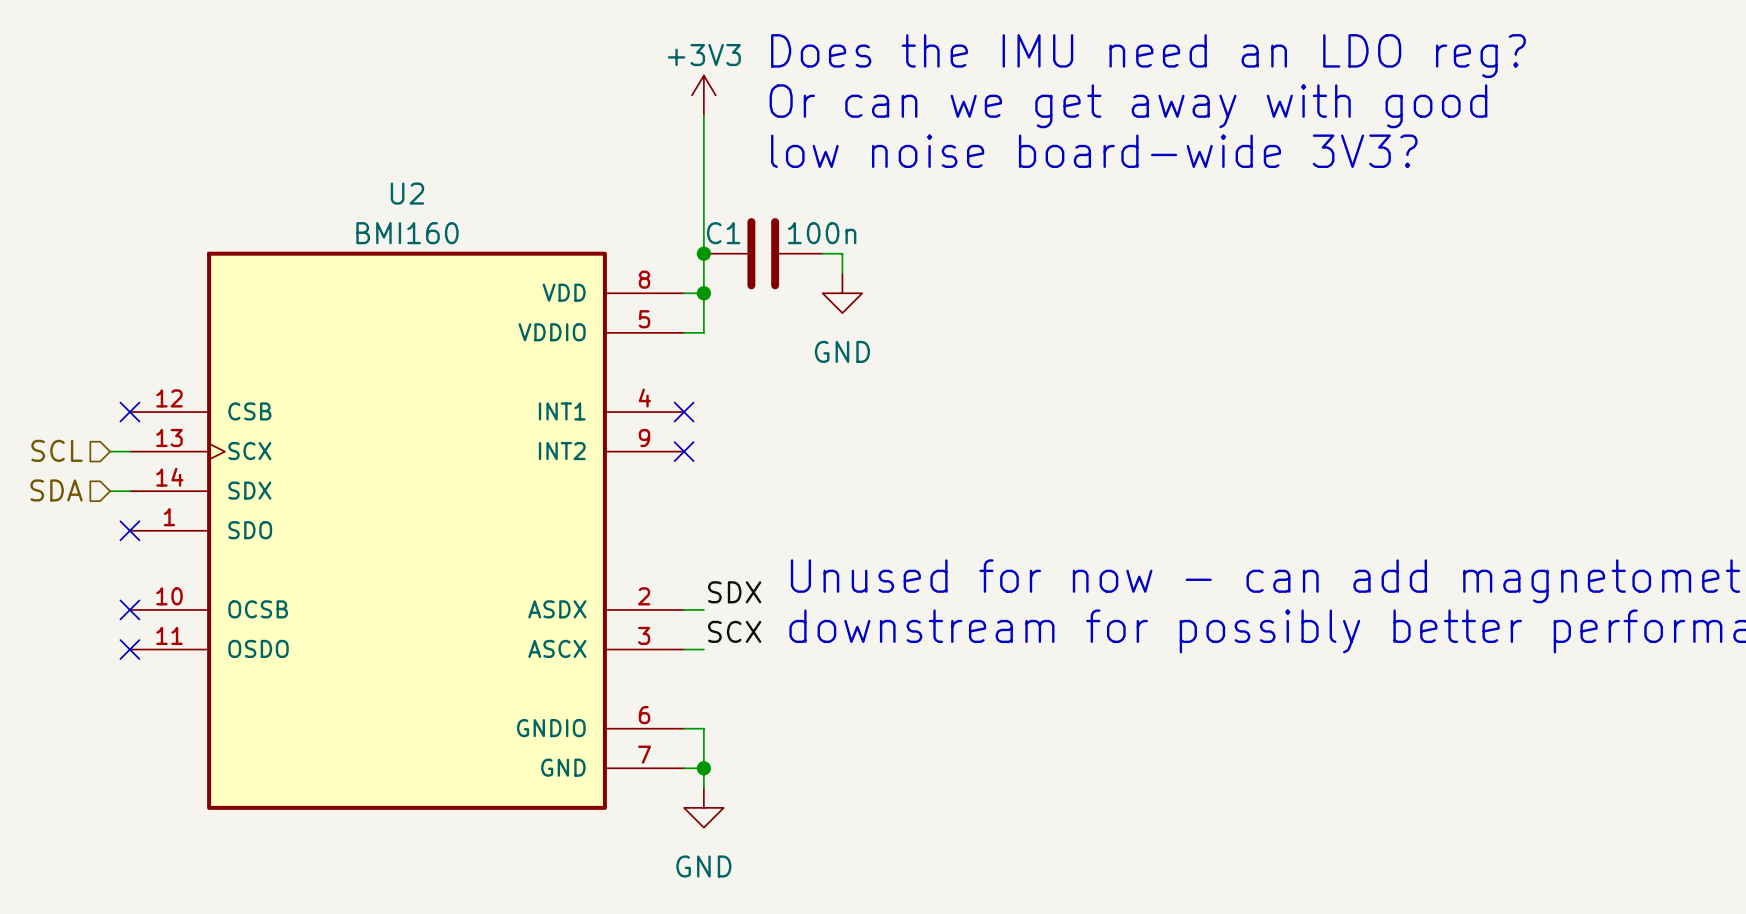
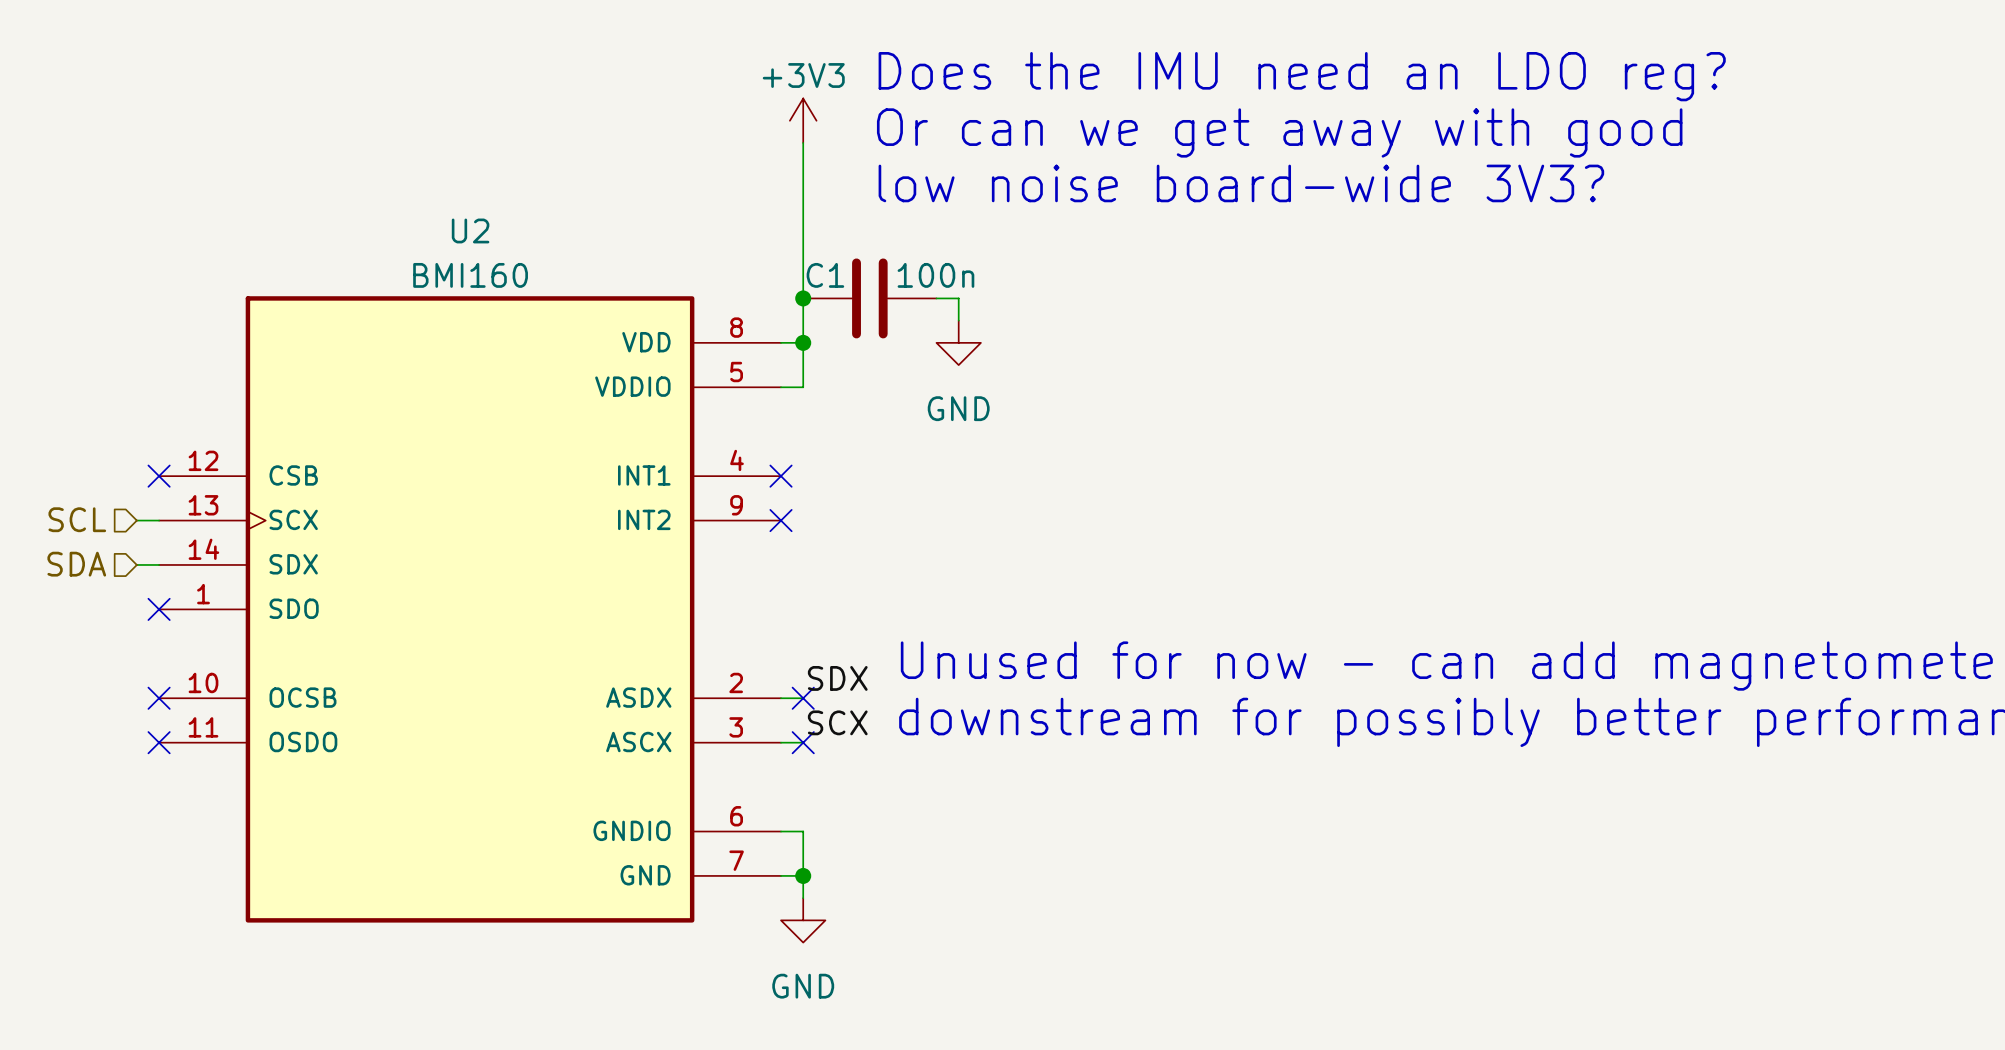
no-connect mark: none -> (803, 698)
no-connect mark: none -> (803, 742)

